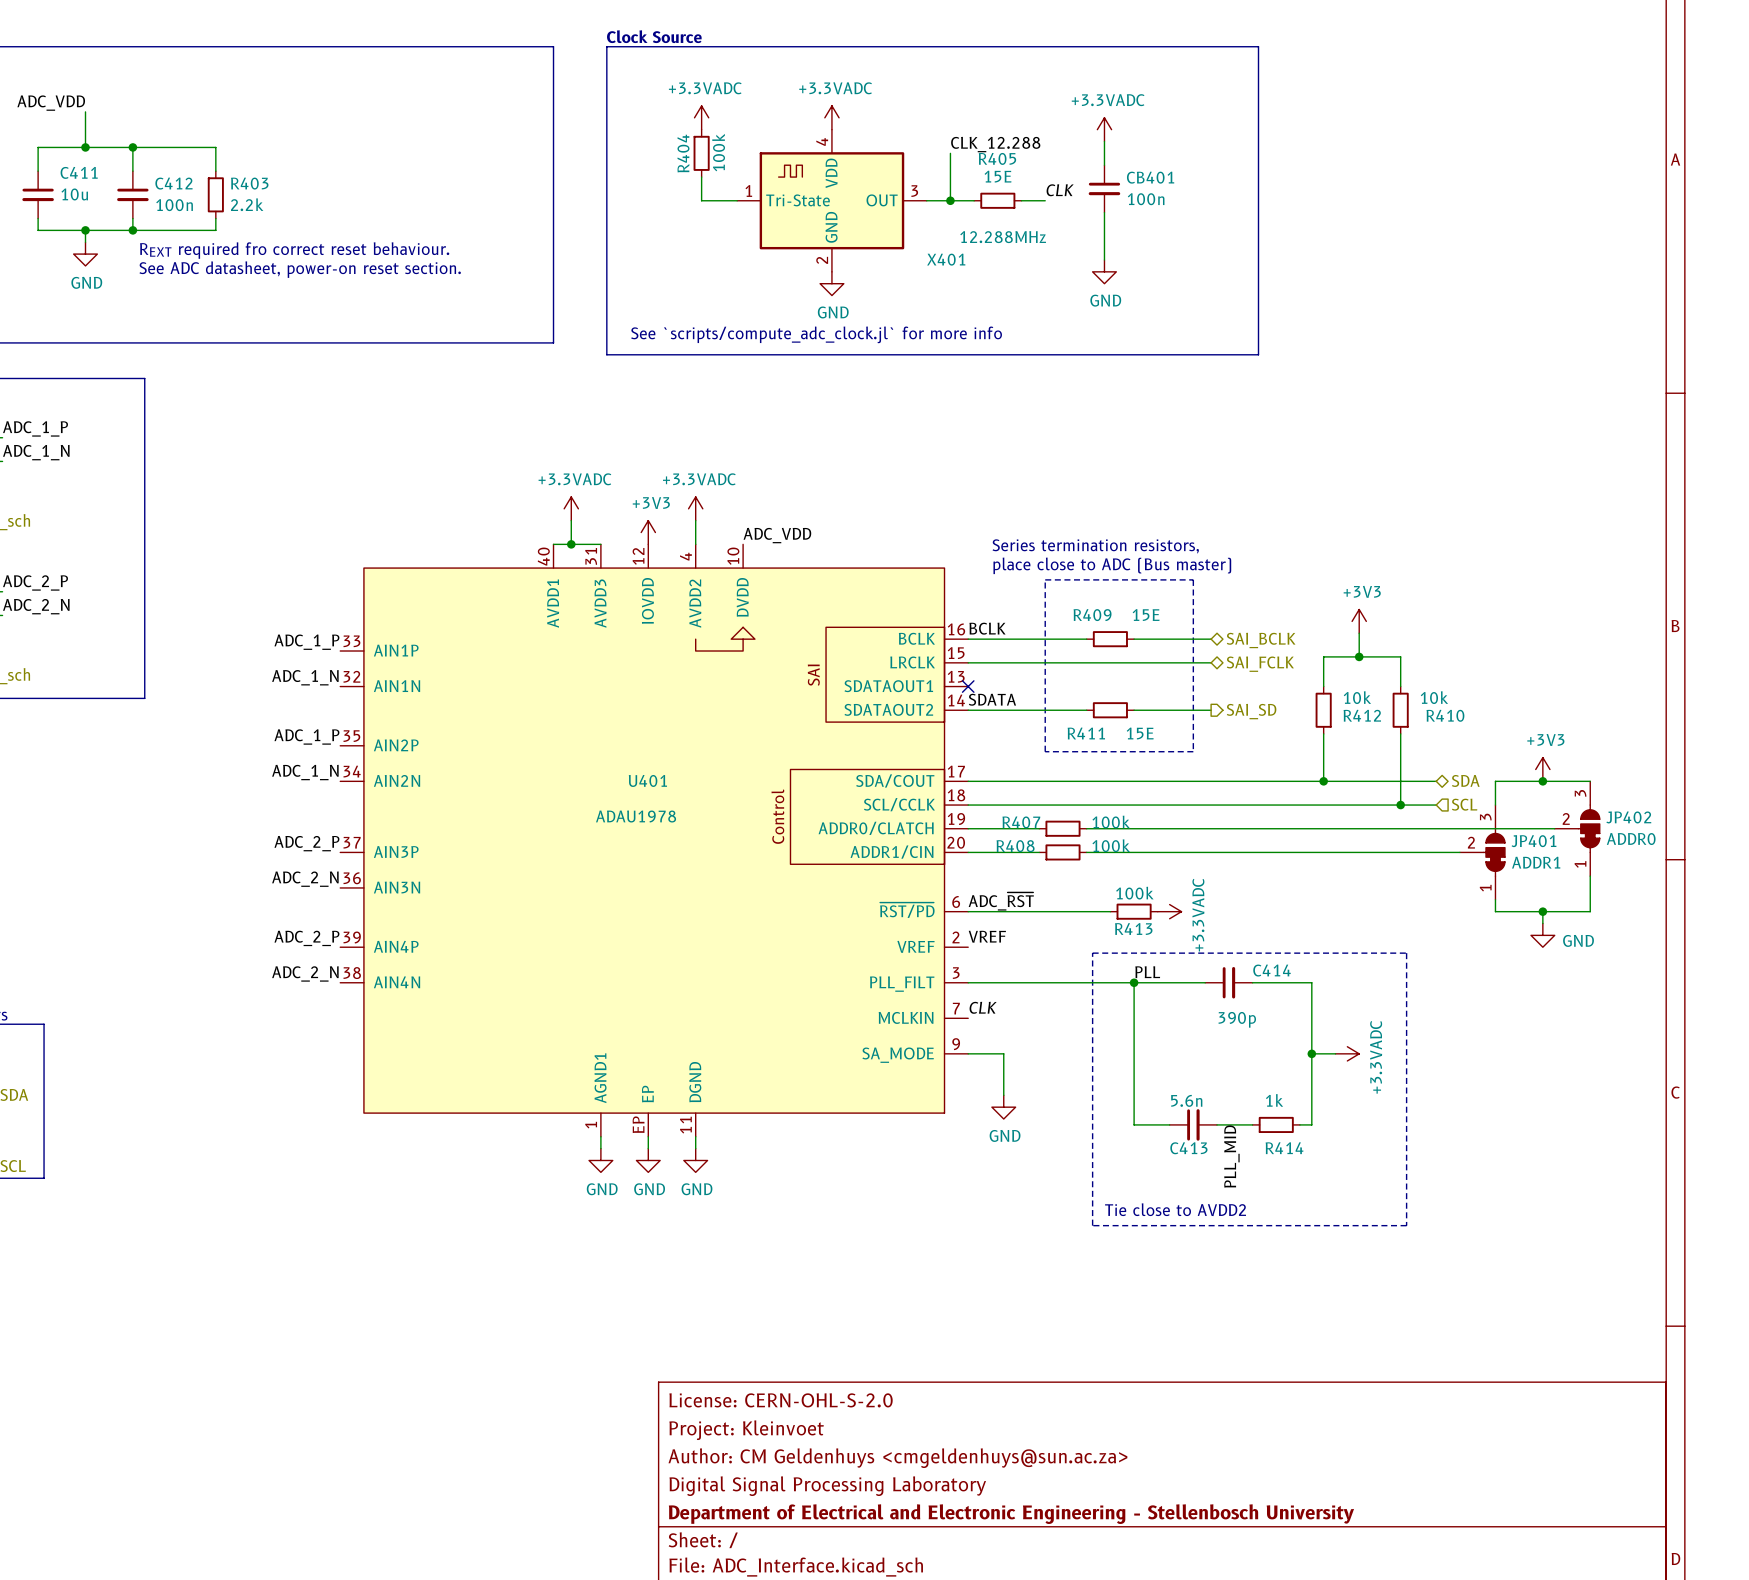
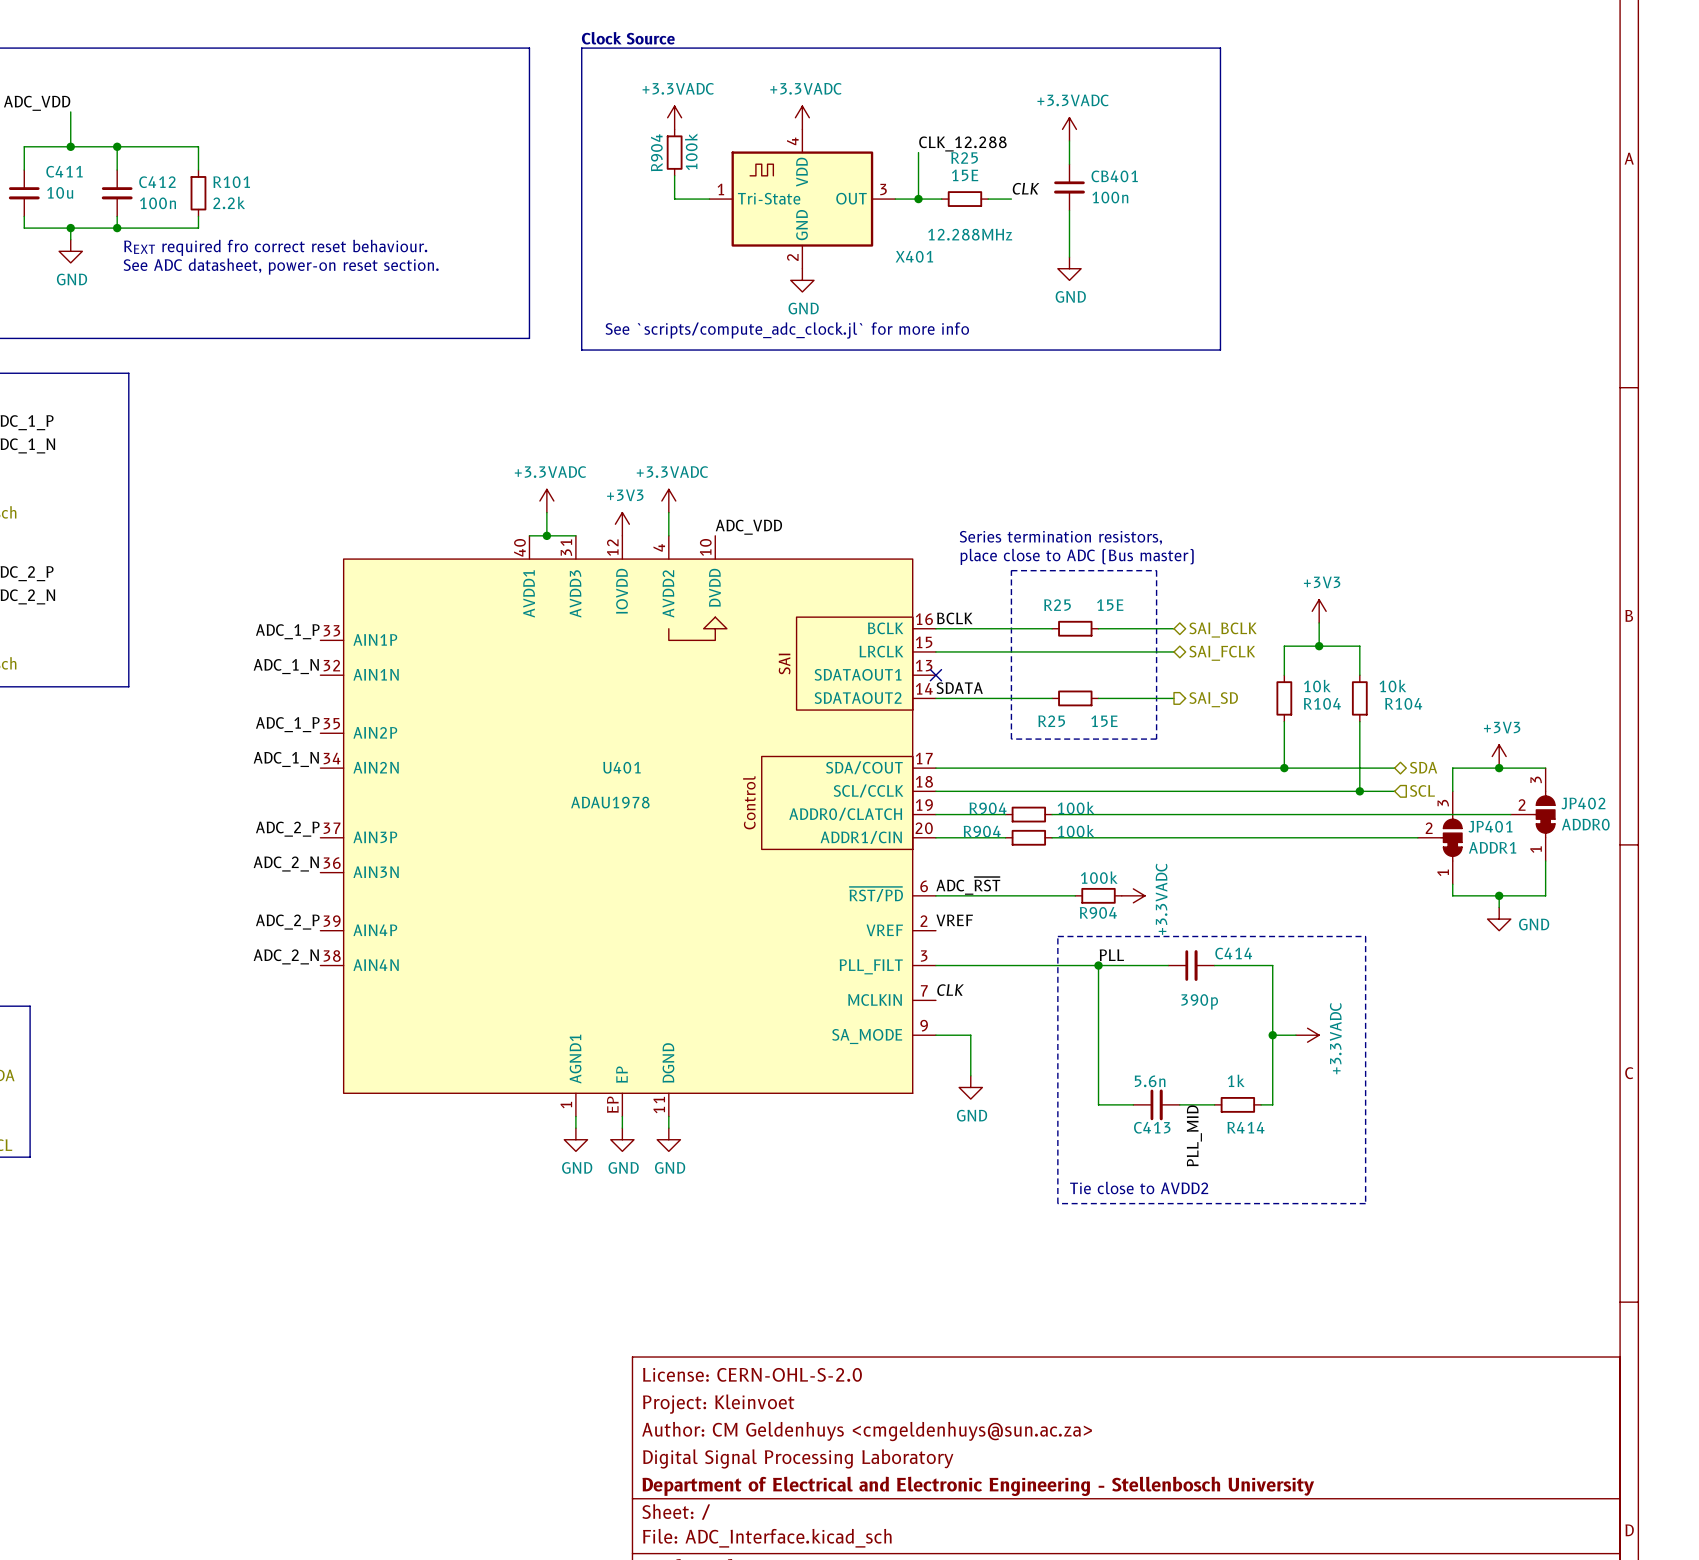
R404 name: R404 (683, 153) -> R904 (656, 152)
R405 name: R405 (997, 158) -> R25 (964, 157)
R403 name: R403 (249, 183) -> R101 (231, 182)
R409 name: R409 (1092, 615) -> R25 (1057, 605)
R412 name: R412 (1362, 715) -> R104 (1322, 703)
R410 name: R410 (1445, 715) -> R104 (1403, 703)
R411 name: R411 (1086, 733) -> R25 (1051, 721)
R407 name: R407 (1021, 822) -> R904 (988, 808)
R408 name: R408 (1015, 846) -> R904 (982, 831)
R413 name: R413 (1133, 929) -> R904 (1098, 912)

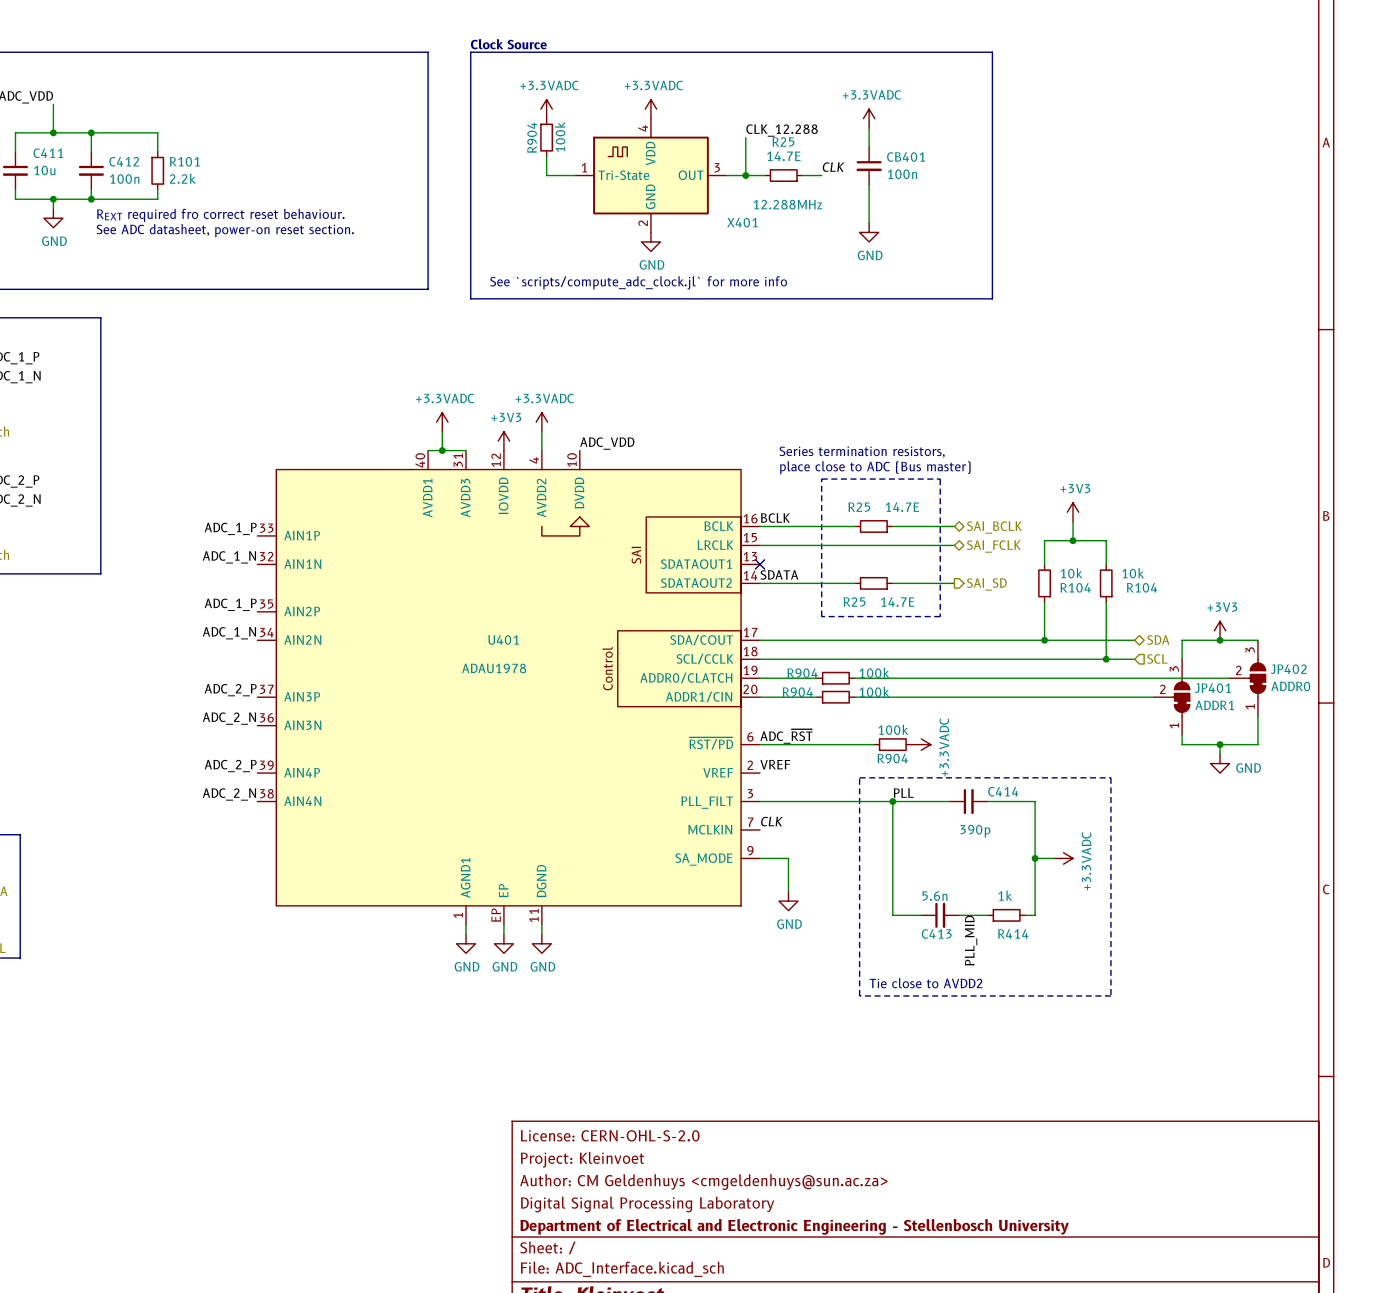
R25 value: 15E (965, 175) -> 14.7E (783, 156)
R25 value: 15E (1110, 605) -> 14.7E (902, 507)
R25 value: 15E (1104, 721) -> 14.7E (897, 602)

